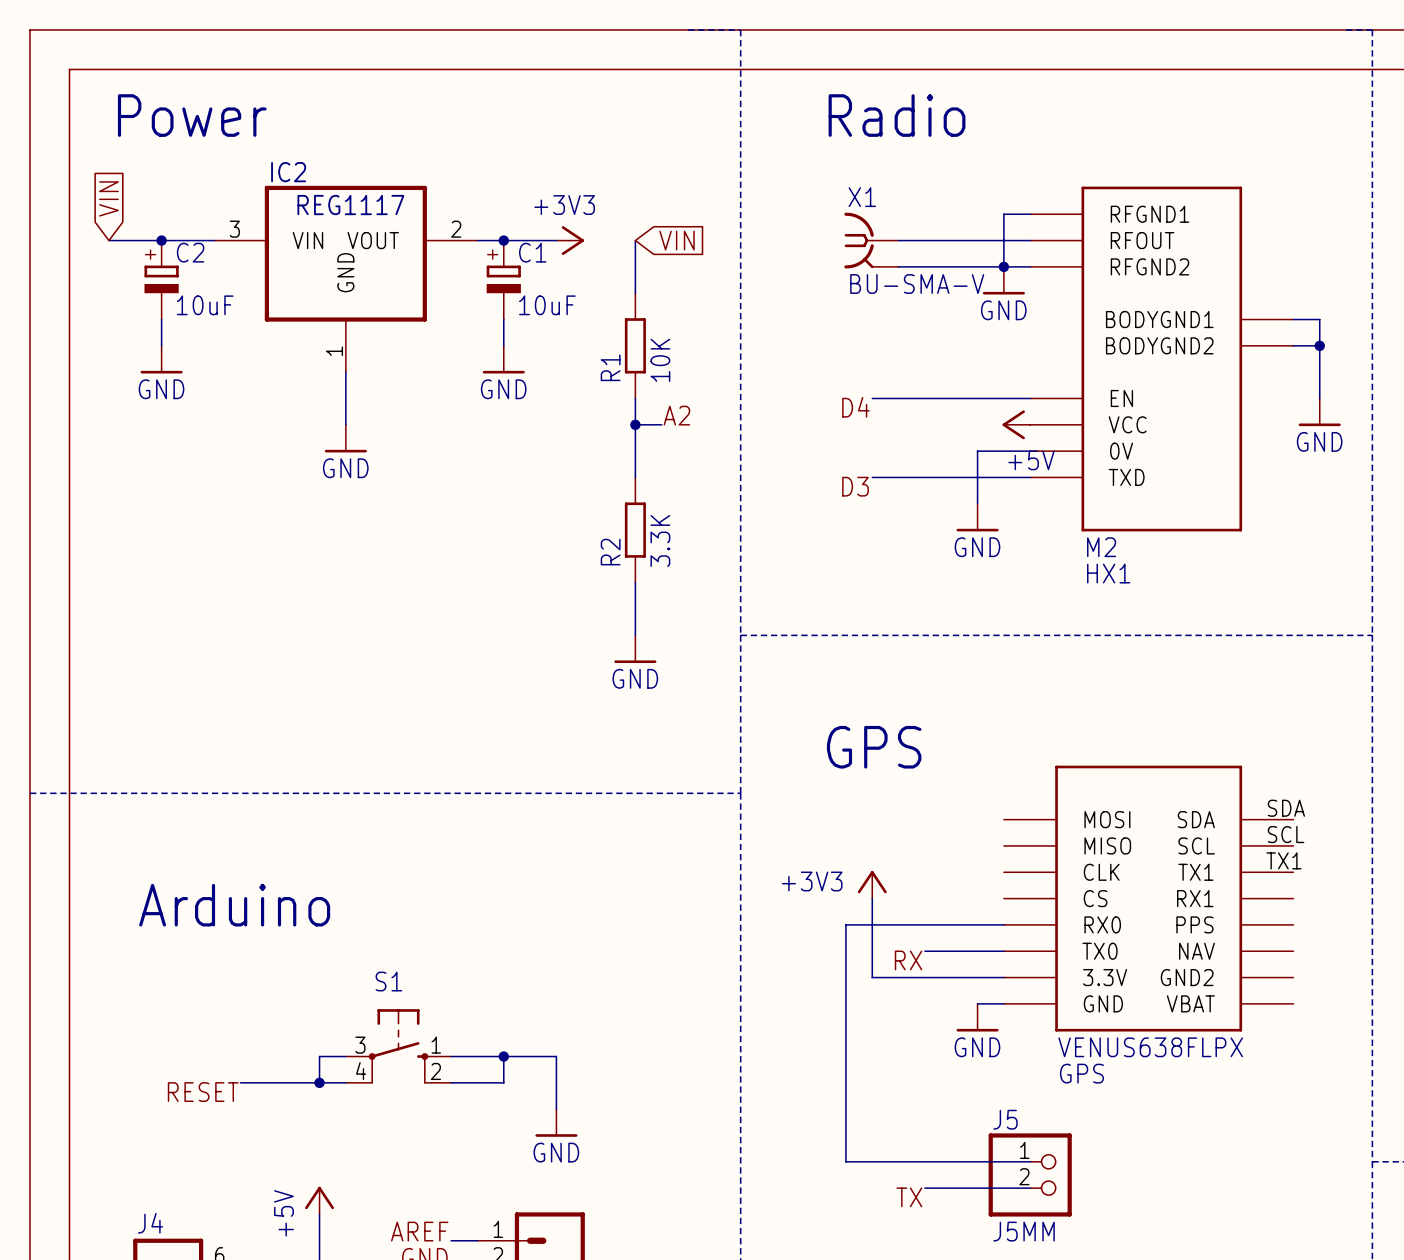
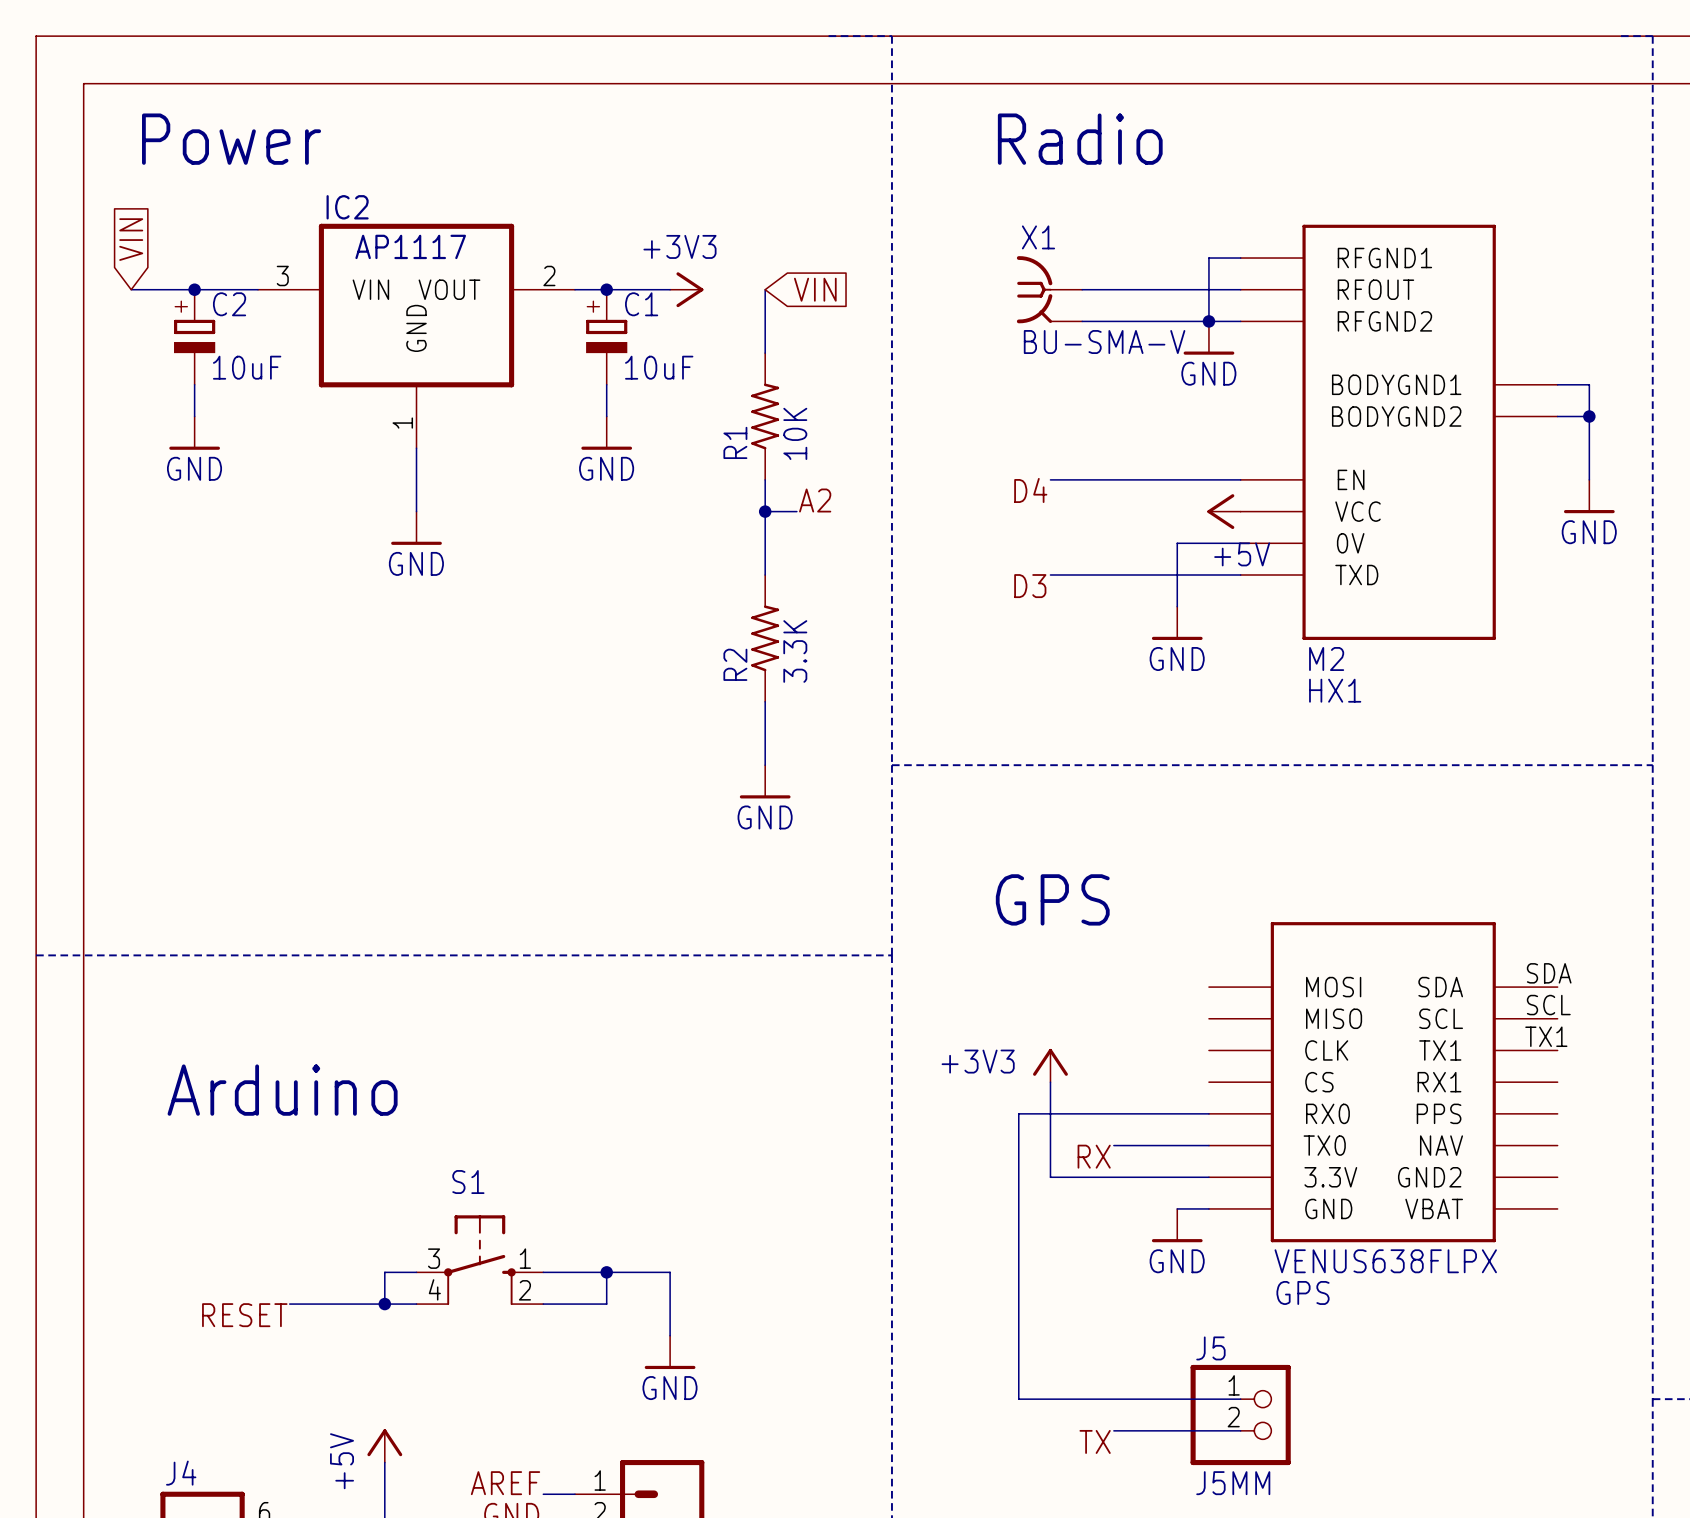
IC2 value: REG1117 (350, 205) -> AP1117 (410, 246)
R1 symbol: [624, 293, 646, 399] -> [751, 353, 780, 480]
R2 symbol: [624, 477, 646, 583] -> [751, 575, 780, 702]

